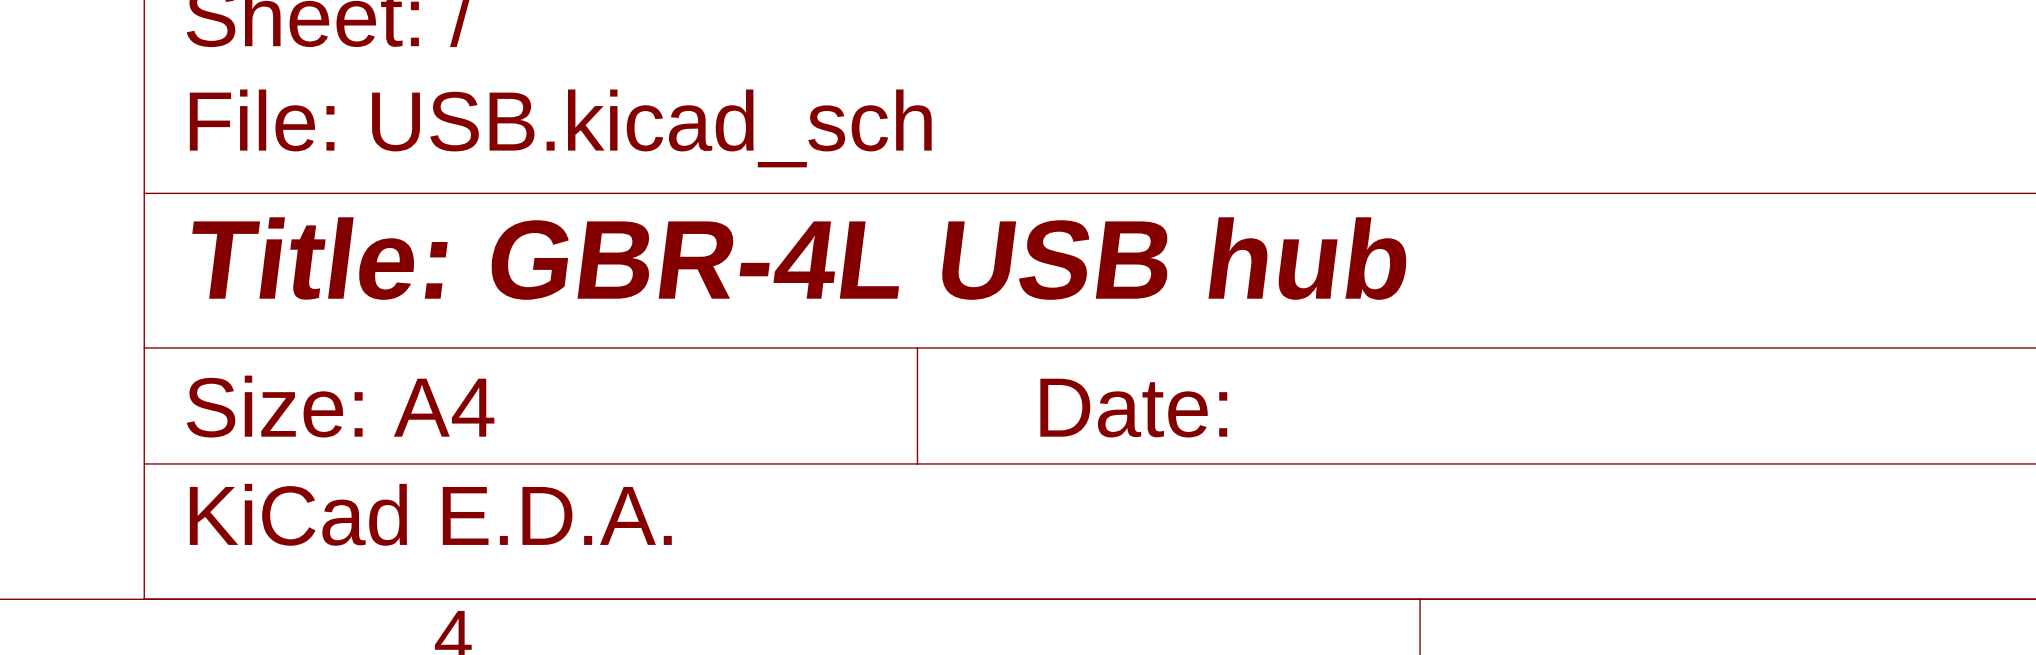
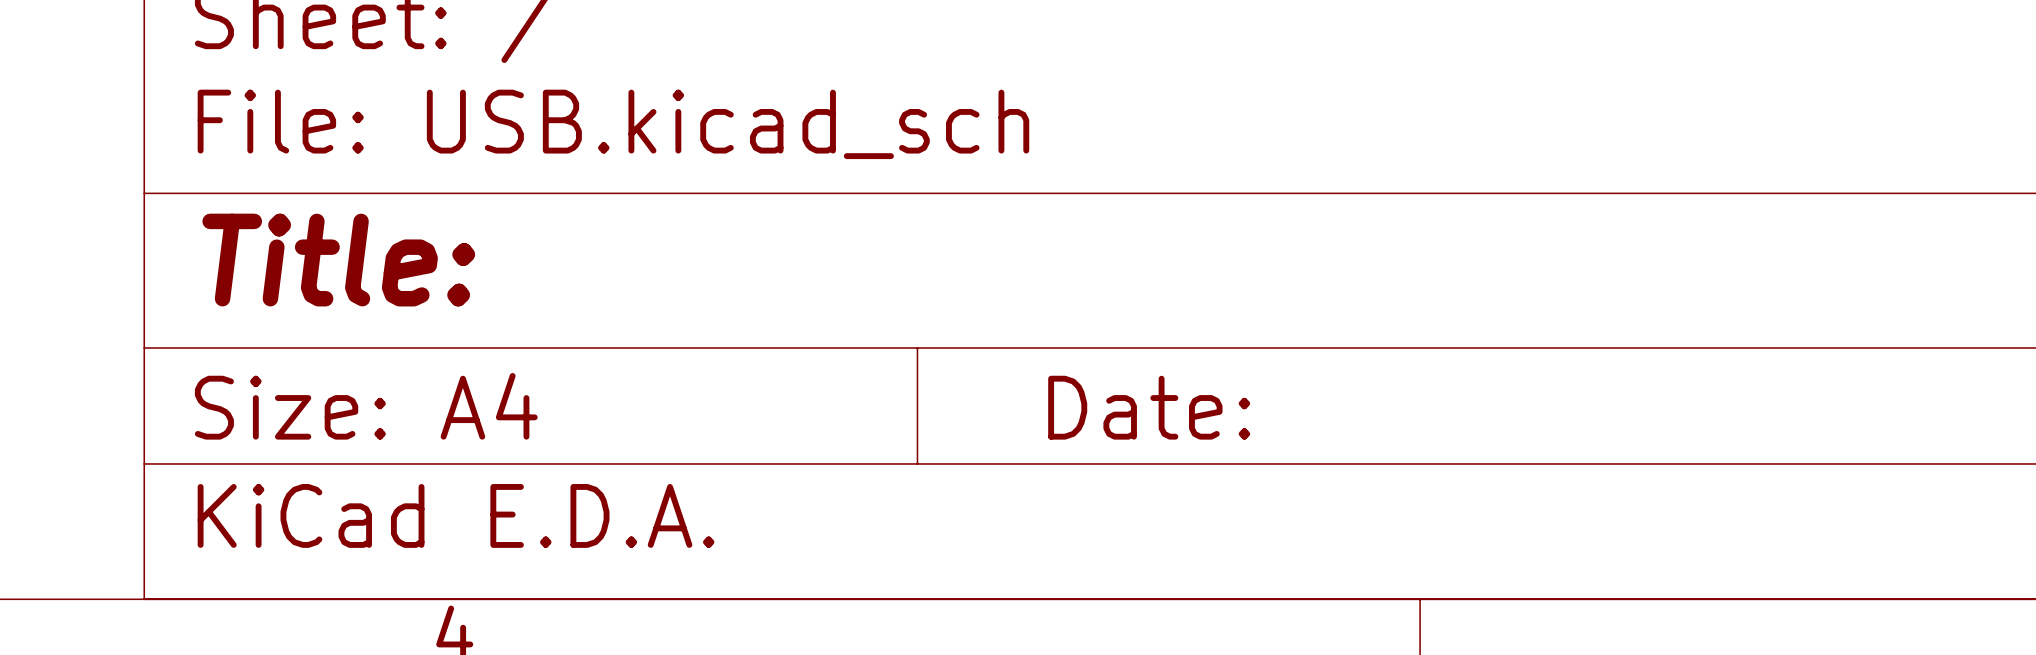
title block: Title: GBR-4L USB hub (799, 258) -> Title: (338, 260)

